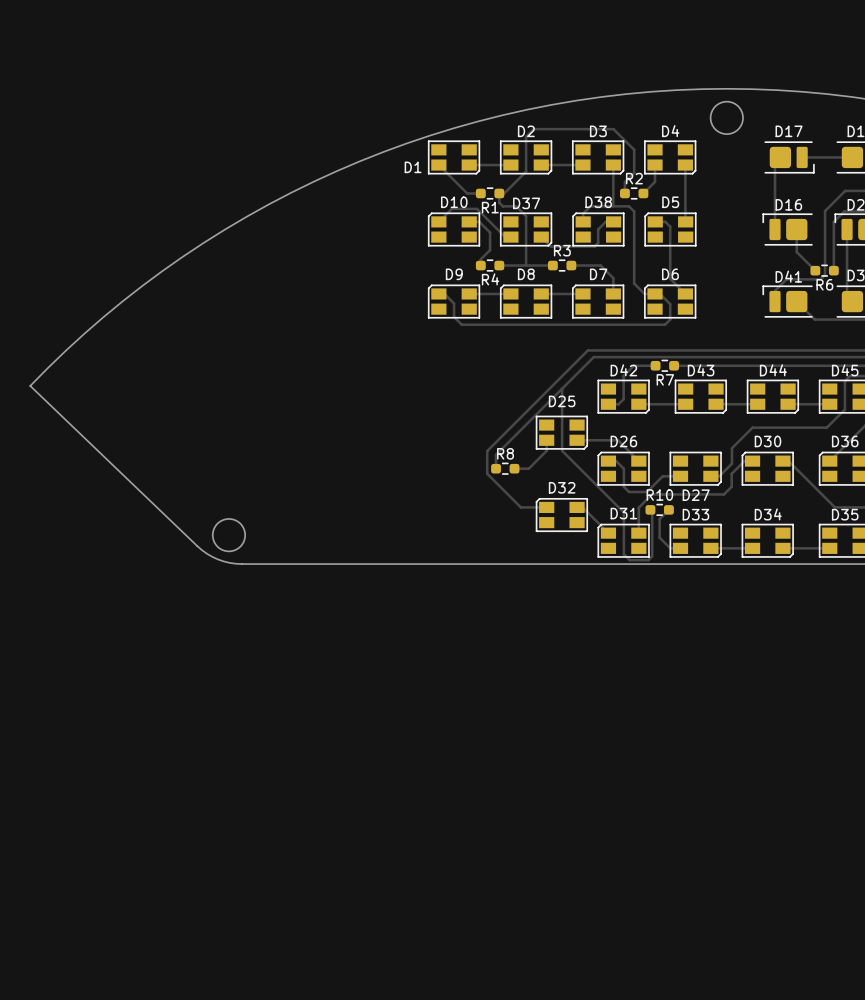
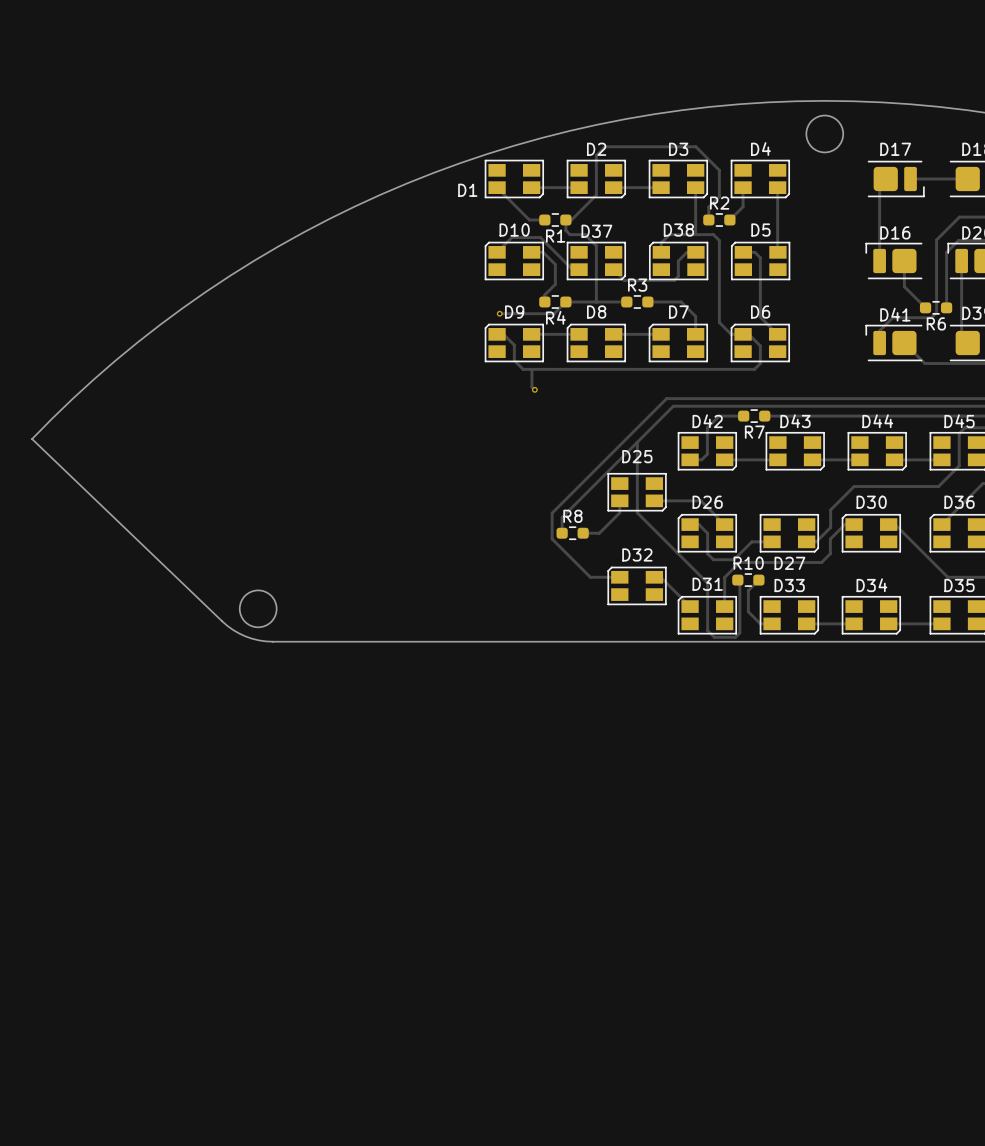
track: none -> (565, 302) (554, 313) (499, 313)
via: none -> (499, 313)
track: none -> (531, 369) (531, 386) (534, 389)
via: none -> (534, 389)

